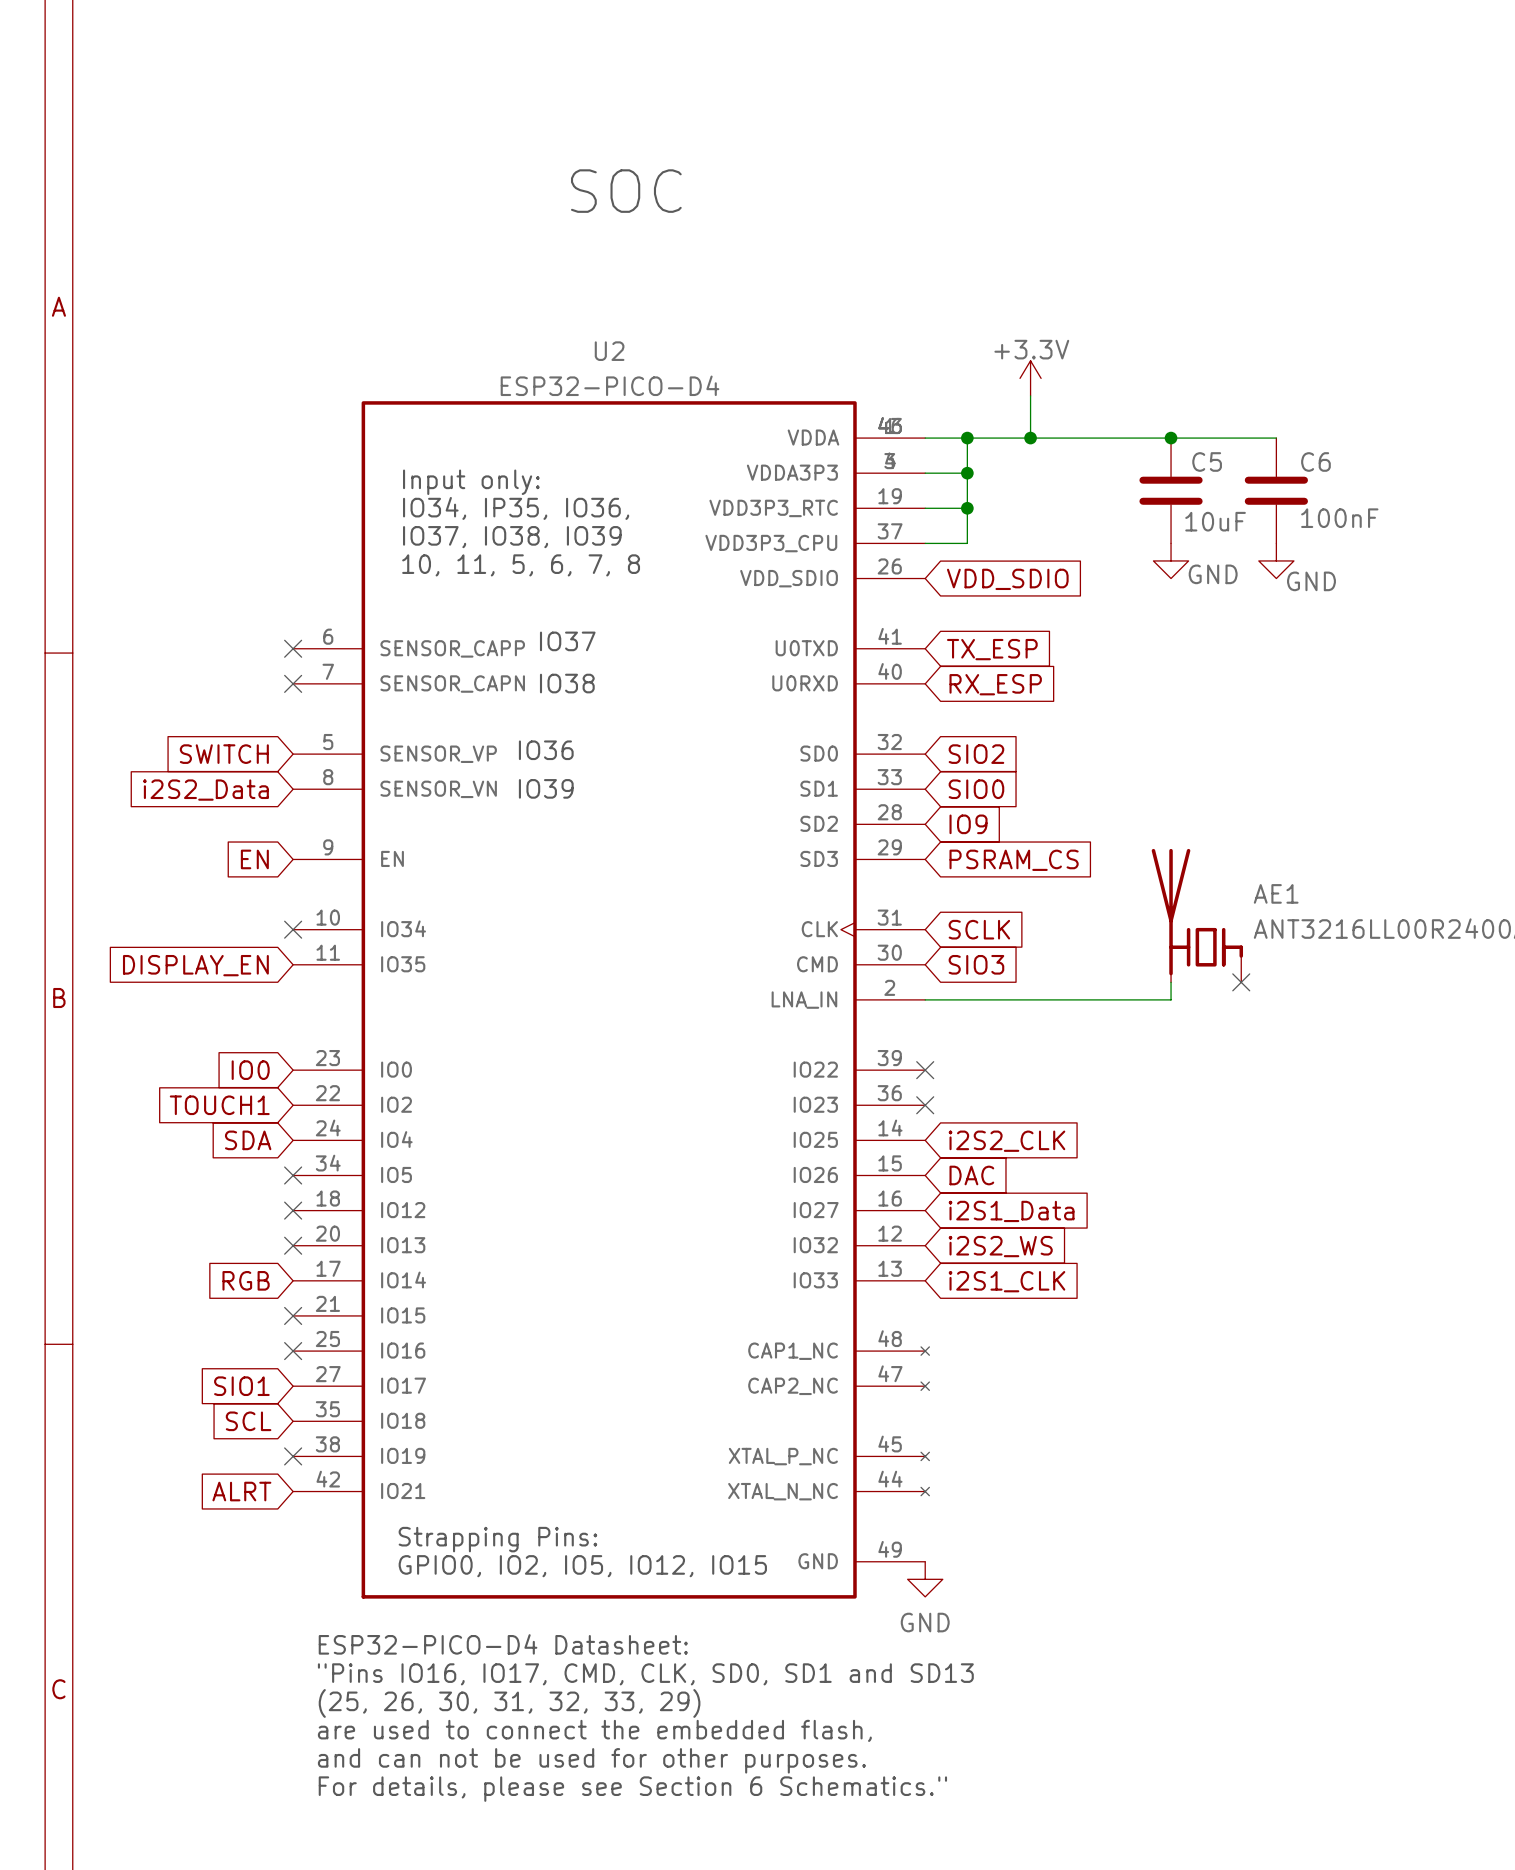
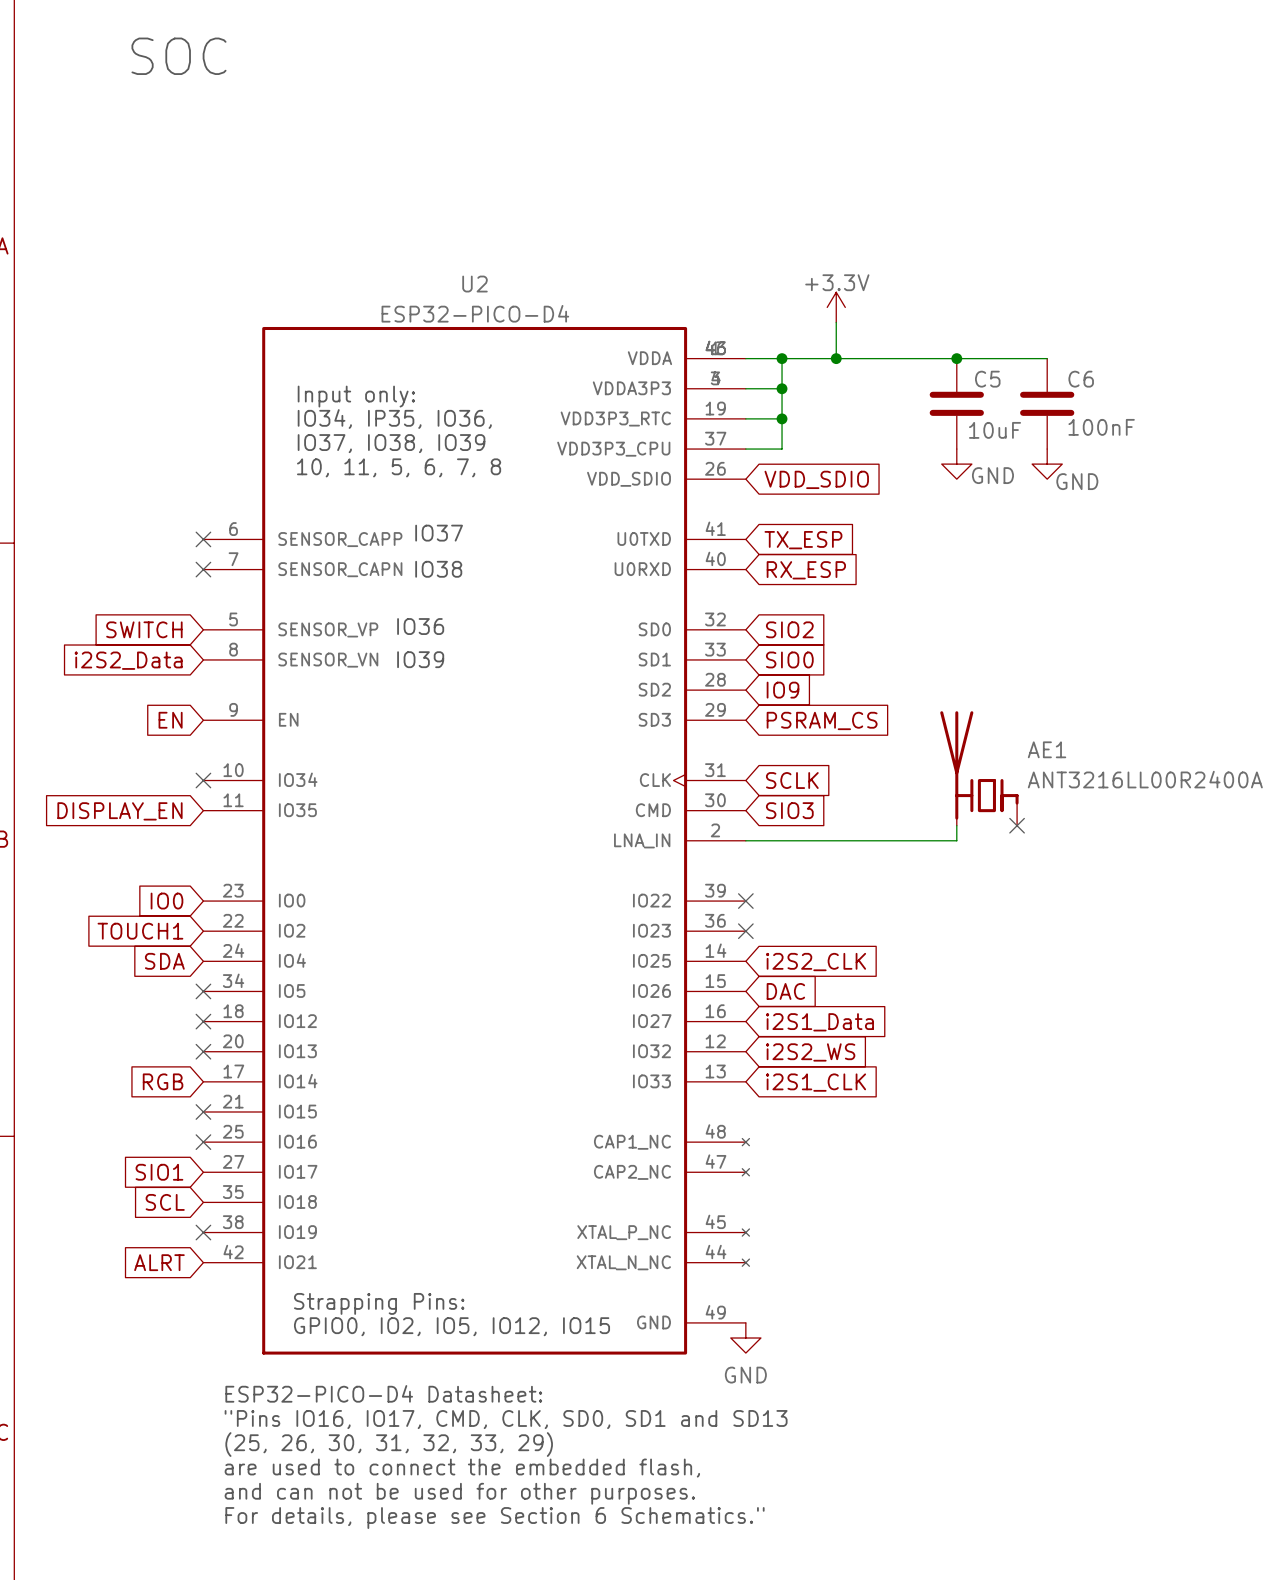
text: none -> SOC (178, 56)
text: SOC (626, 191) -> none

